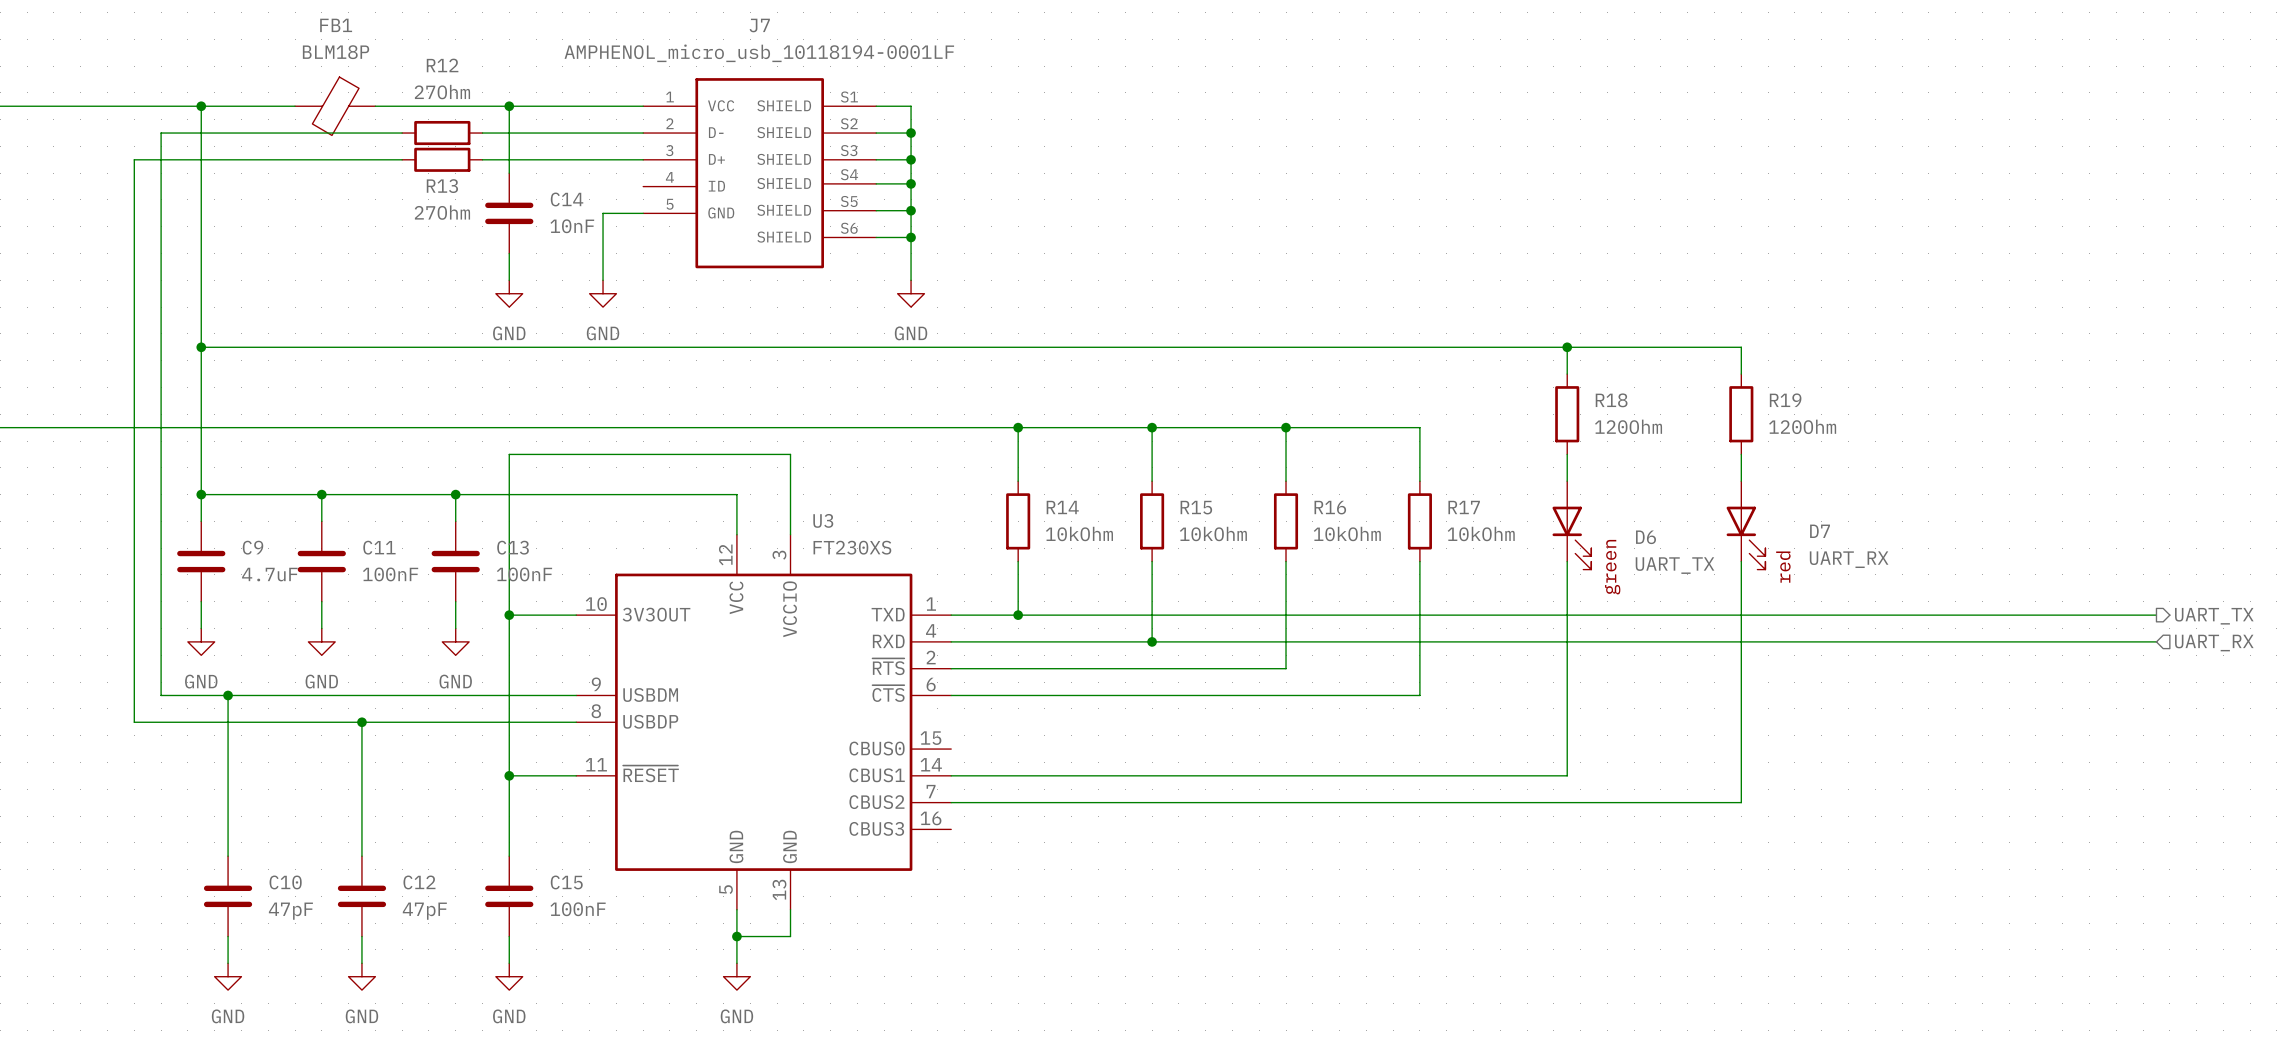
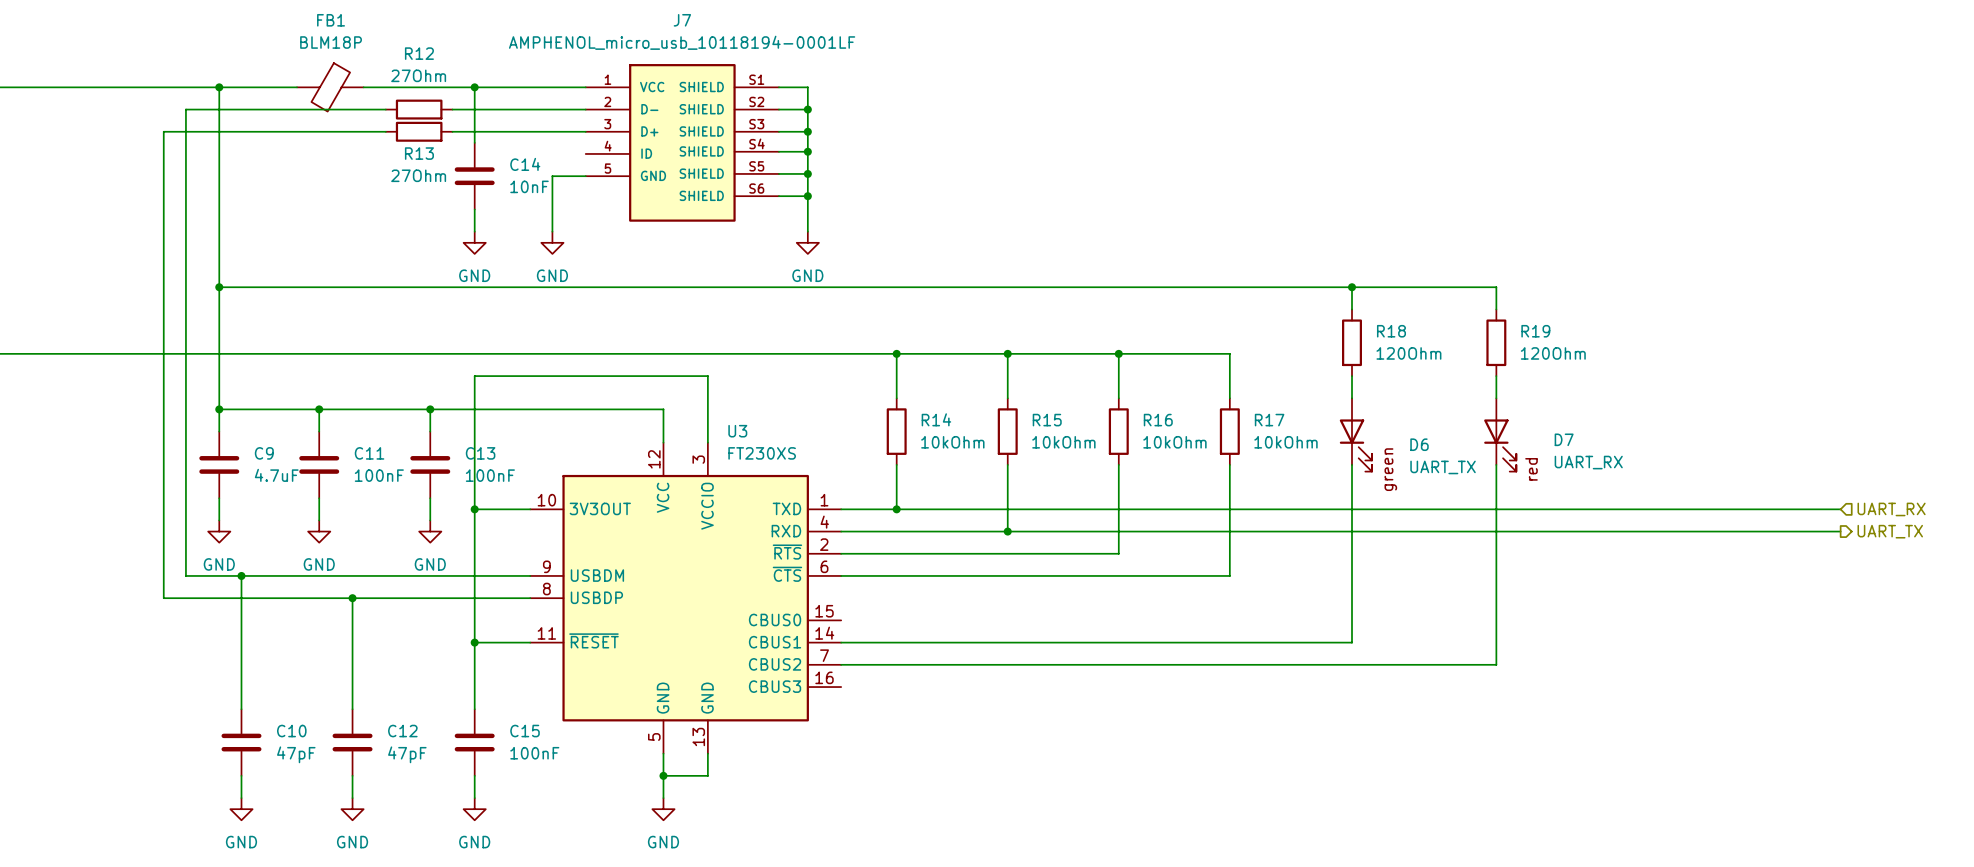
hierarchical label shape: output (2214, 616) -> input (1891, 509)
hierarchical label: UART_TX (2214, 616) -> UART_RX (1891, 509)
hierarchical label shape: input (2214, 643) -> output (1890, 531)
hierarchical label: UART_RX (2214, 643) -> UART_TX (1890, 531)

